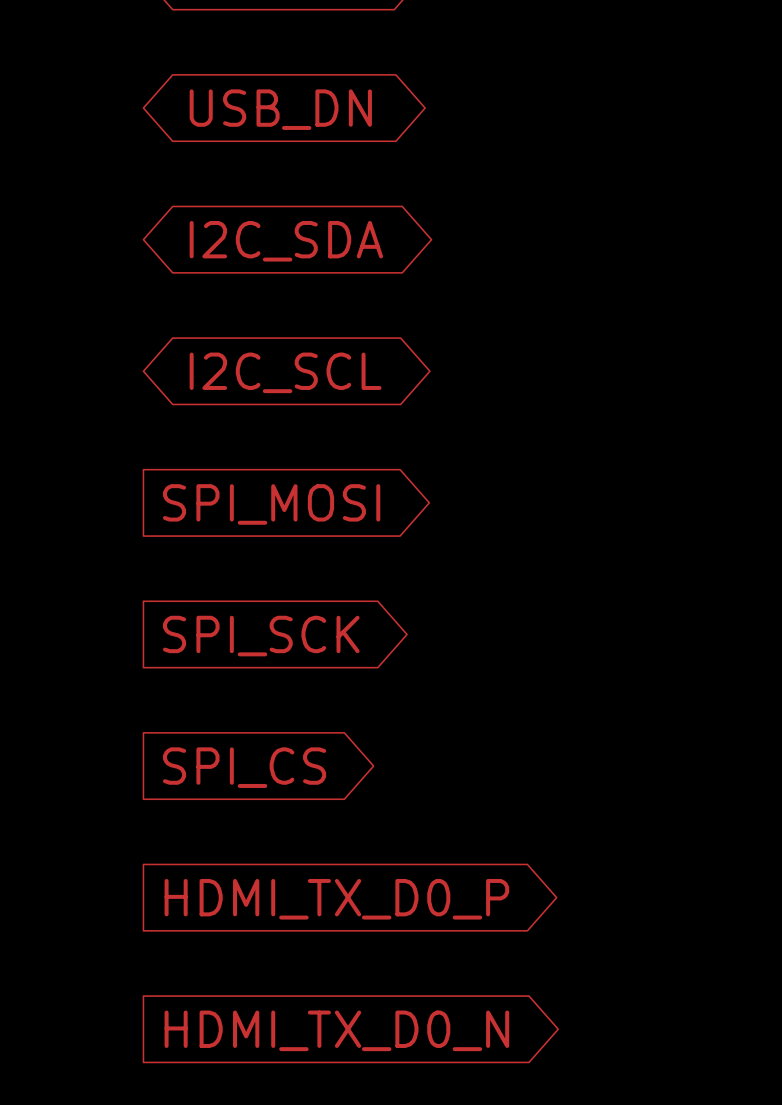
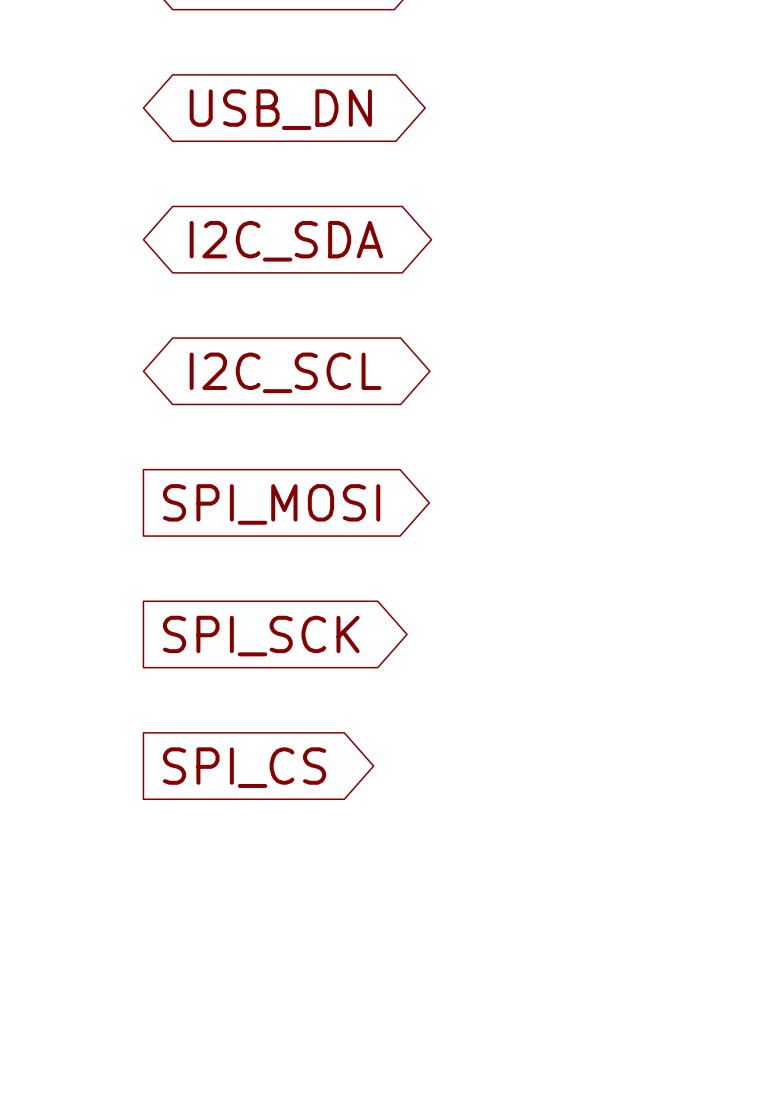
global label: HDMI_TX_D0_P (336, 899) -> none
global label: HDMI_TX_D0_N (336, 1030) -> none

